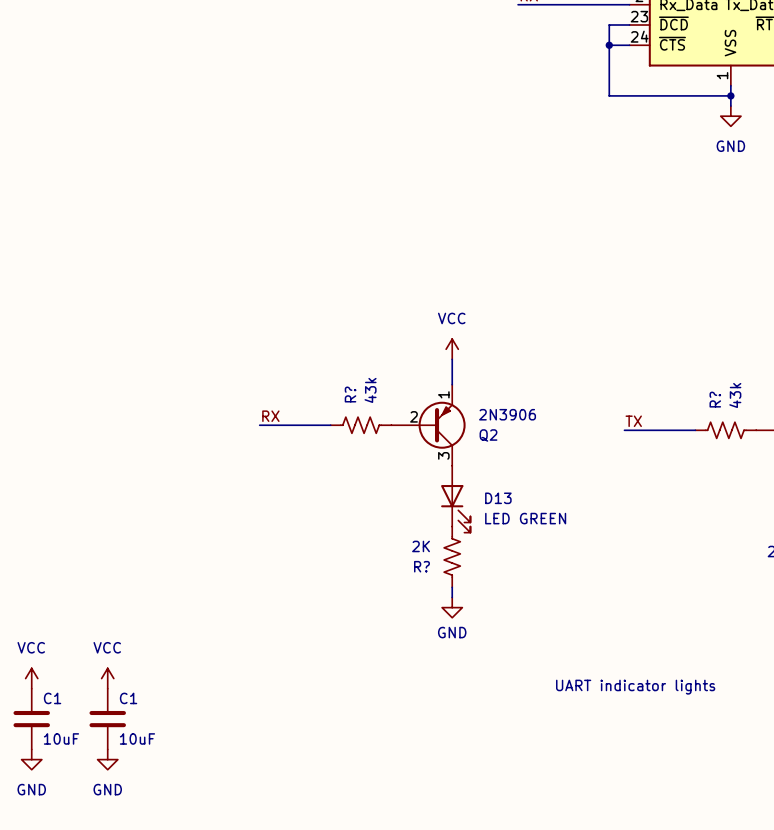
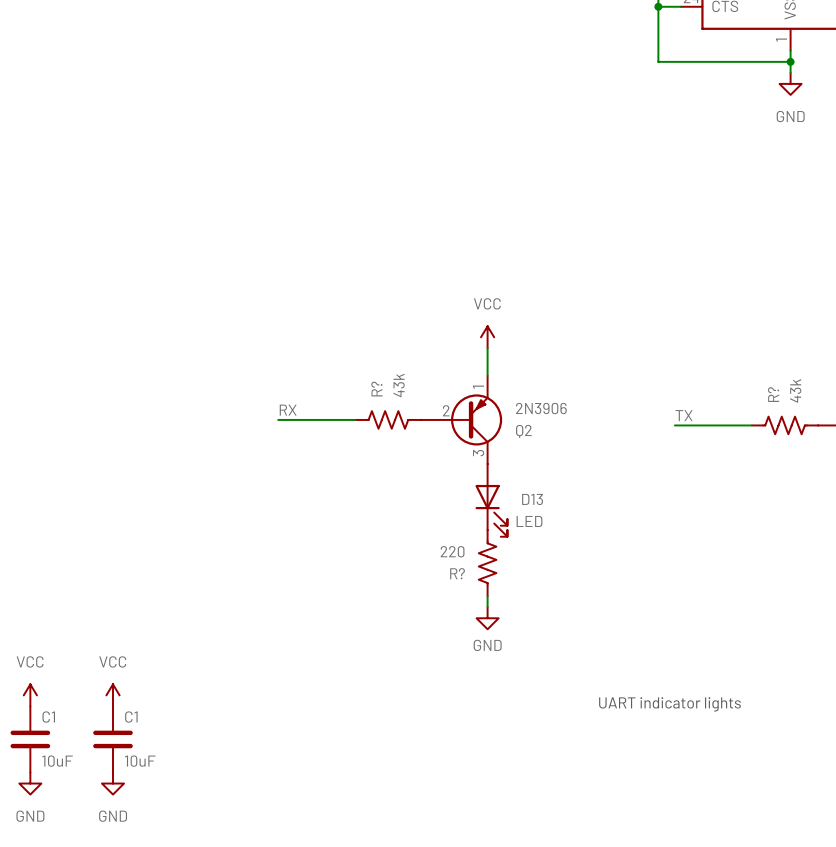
D13 value: LED GREEN (525, 518) -> LED (529, 521)
R? value: 2K (421, 546) -> 220 (452, 551)

